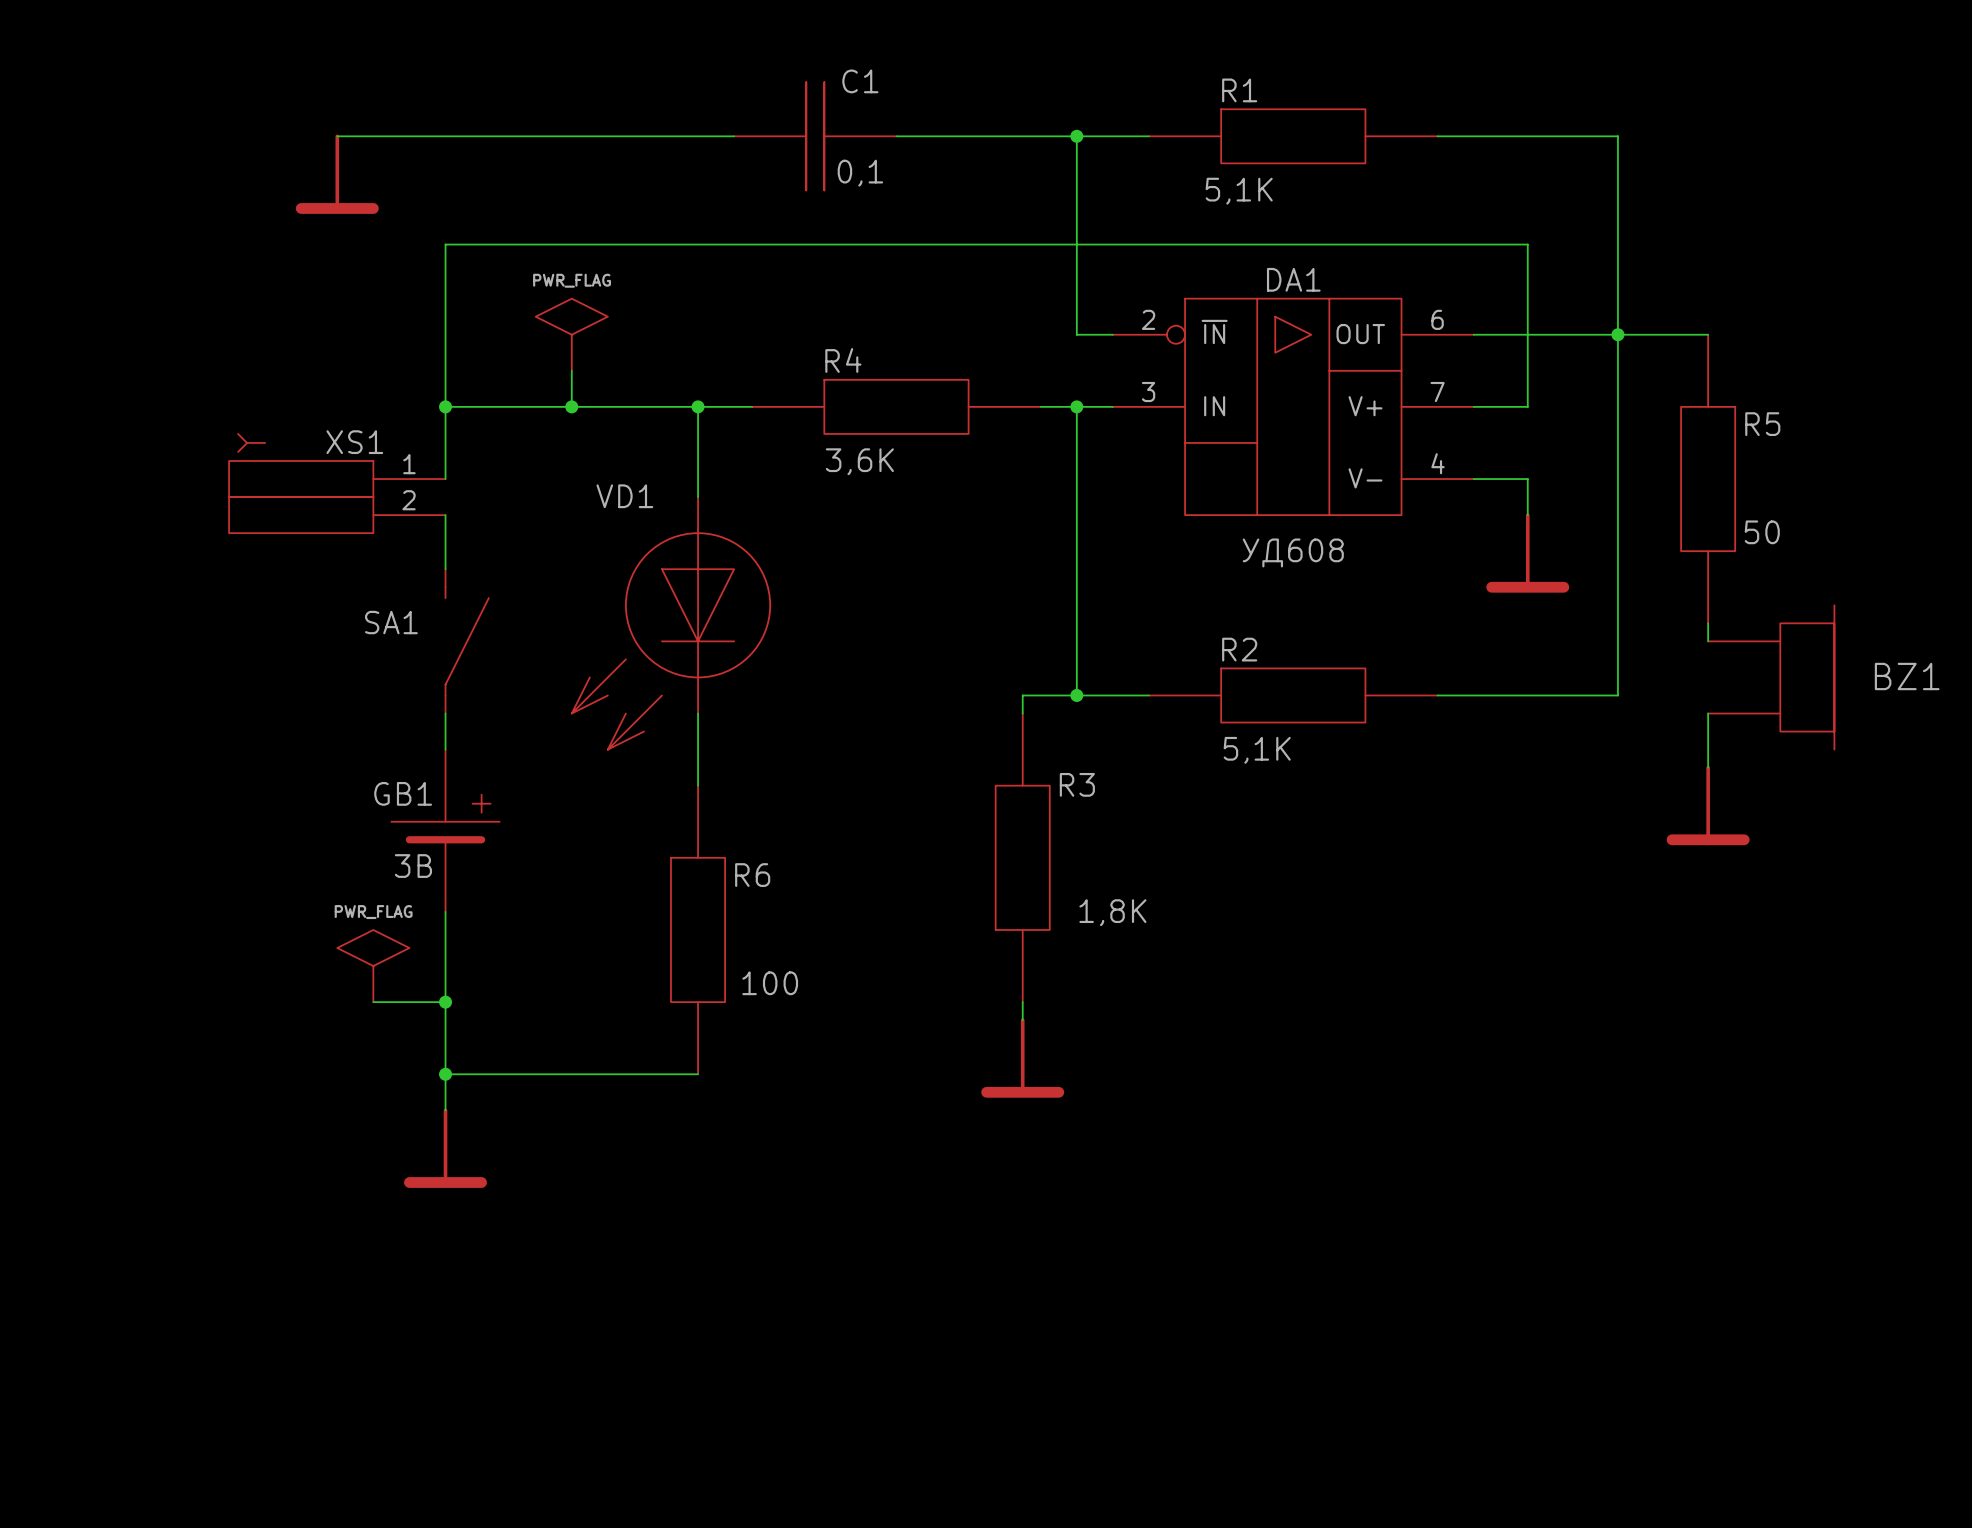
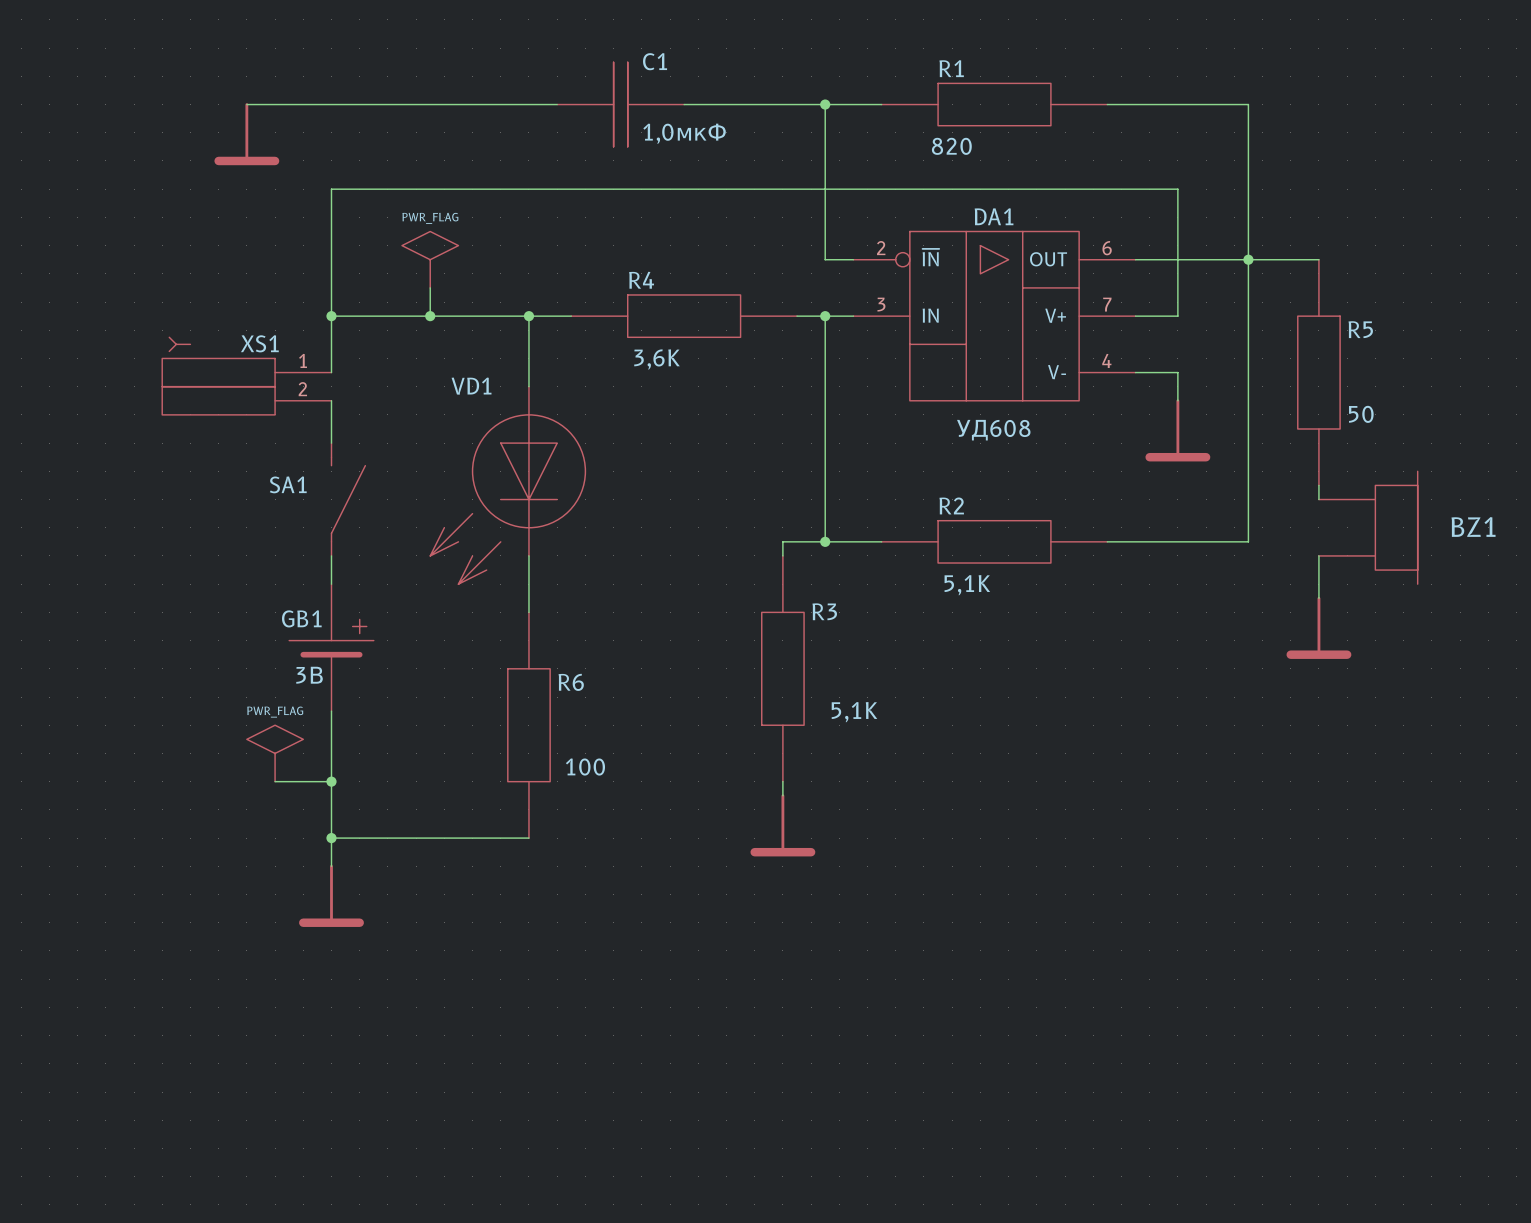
C1 value: 0,1 (860, 173) -> 1,0мкФ (684, 133)
R1 value: 5,1K (1239, 191) -> 820 (951, 146)
R3 value: 1,8K (1112, 912) -> 5,1K (854, 712)

